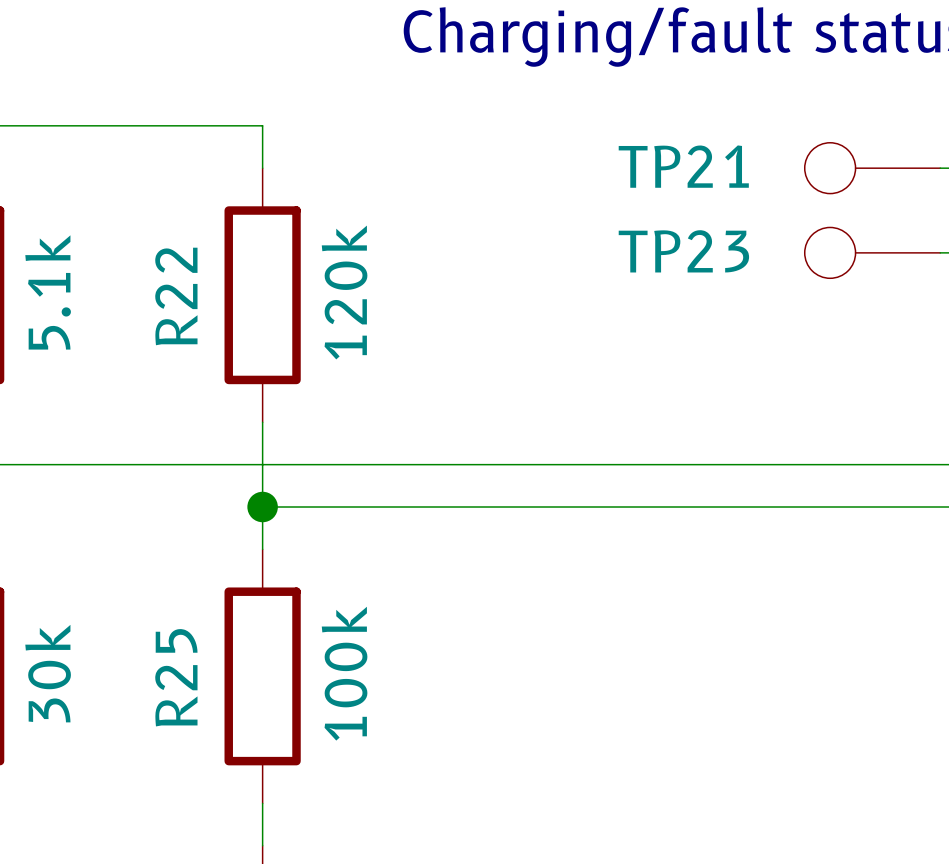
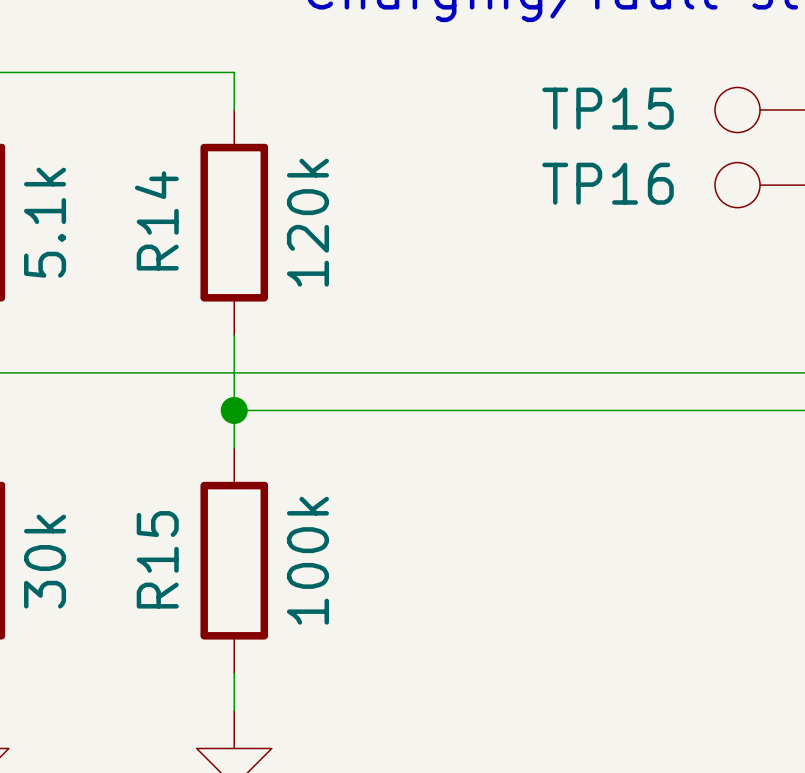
TP21 name: TP21 (683, 166) -> TP15 (608, 108)
TP23 name: TP23 (683, 251) -> TP16 (608, 183)
R22 name: R22 (176, 296) -> R14 (156, 220)
R25 name: R25 (176, 677) -> R15 (157, 559)

